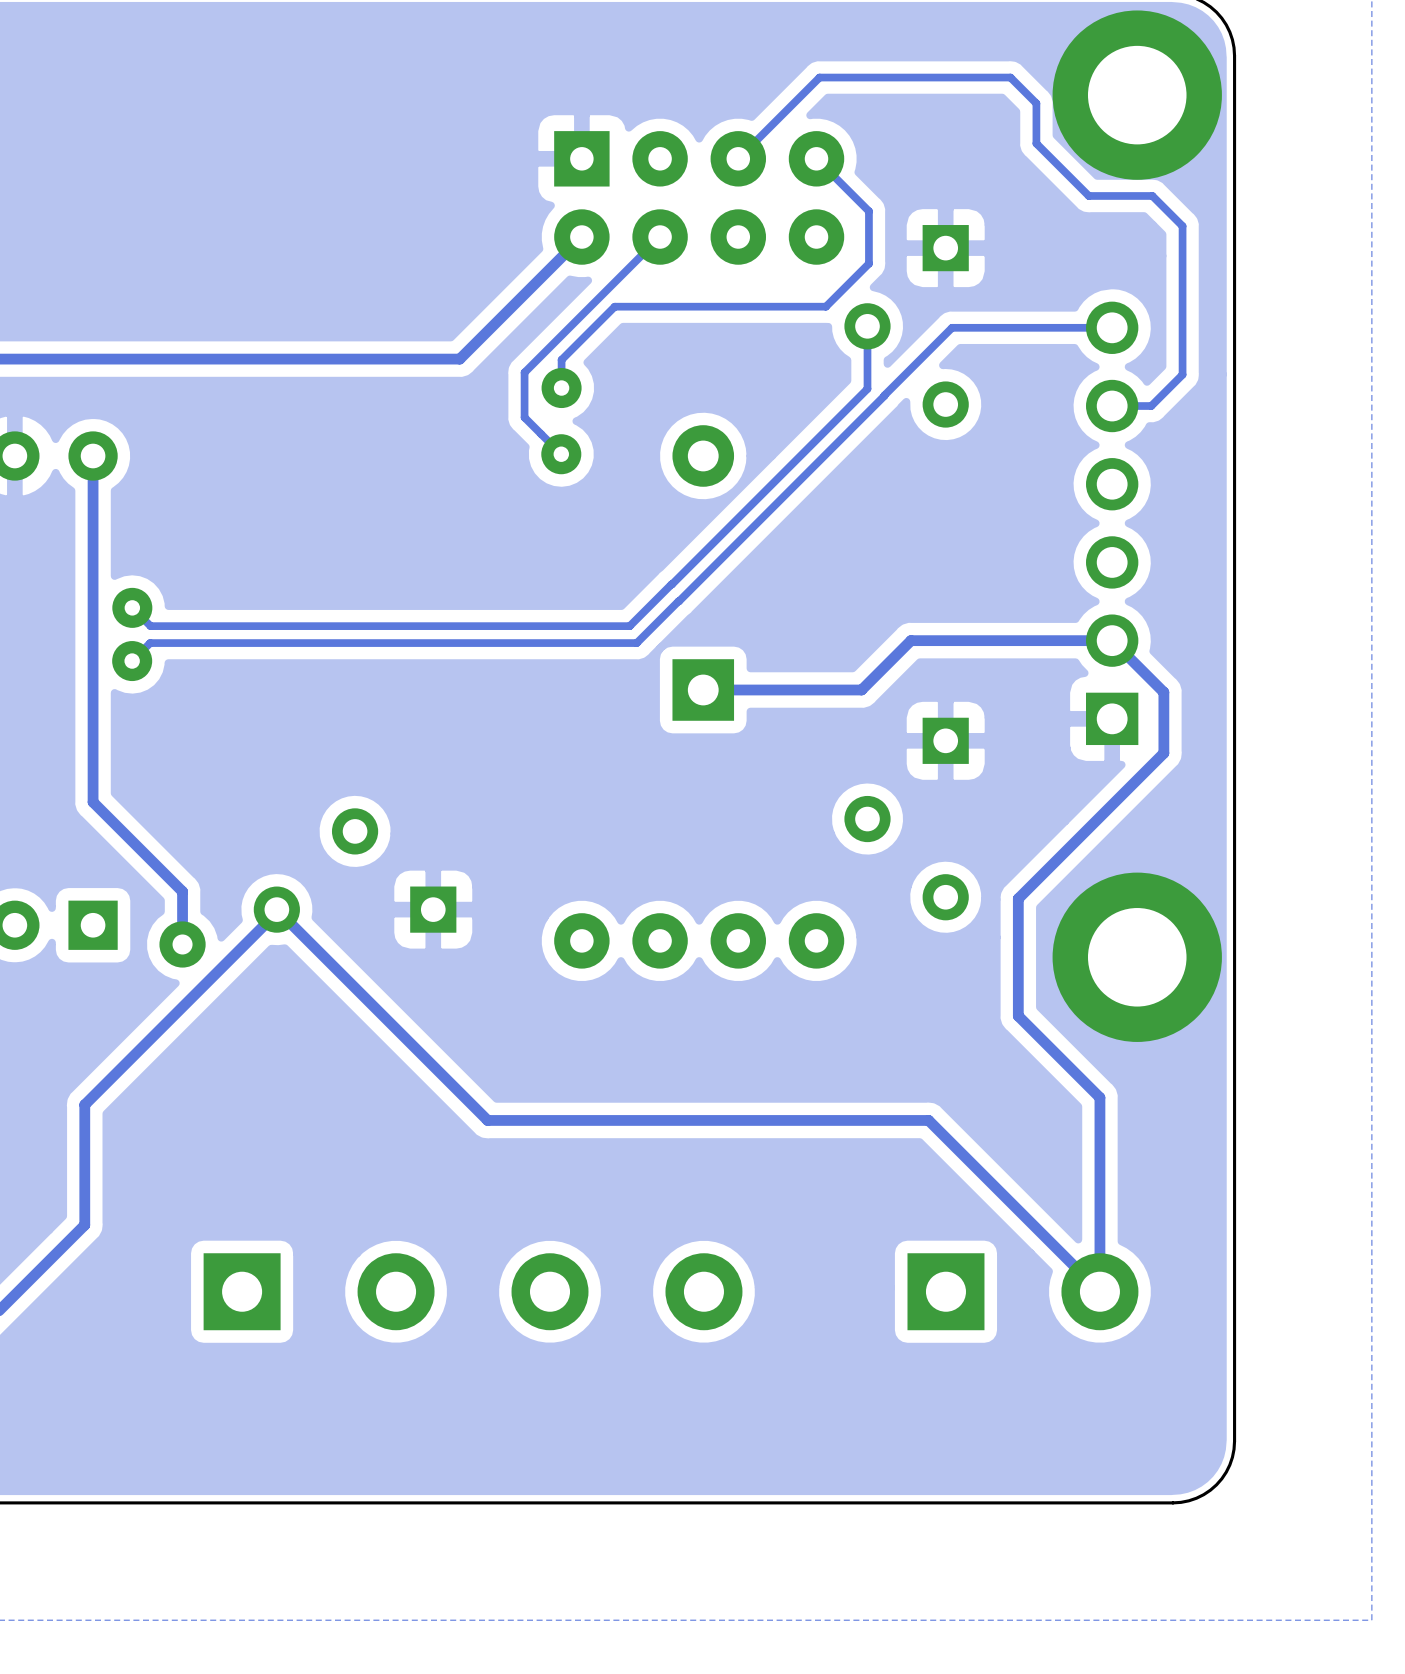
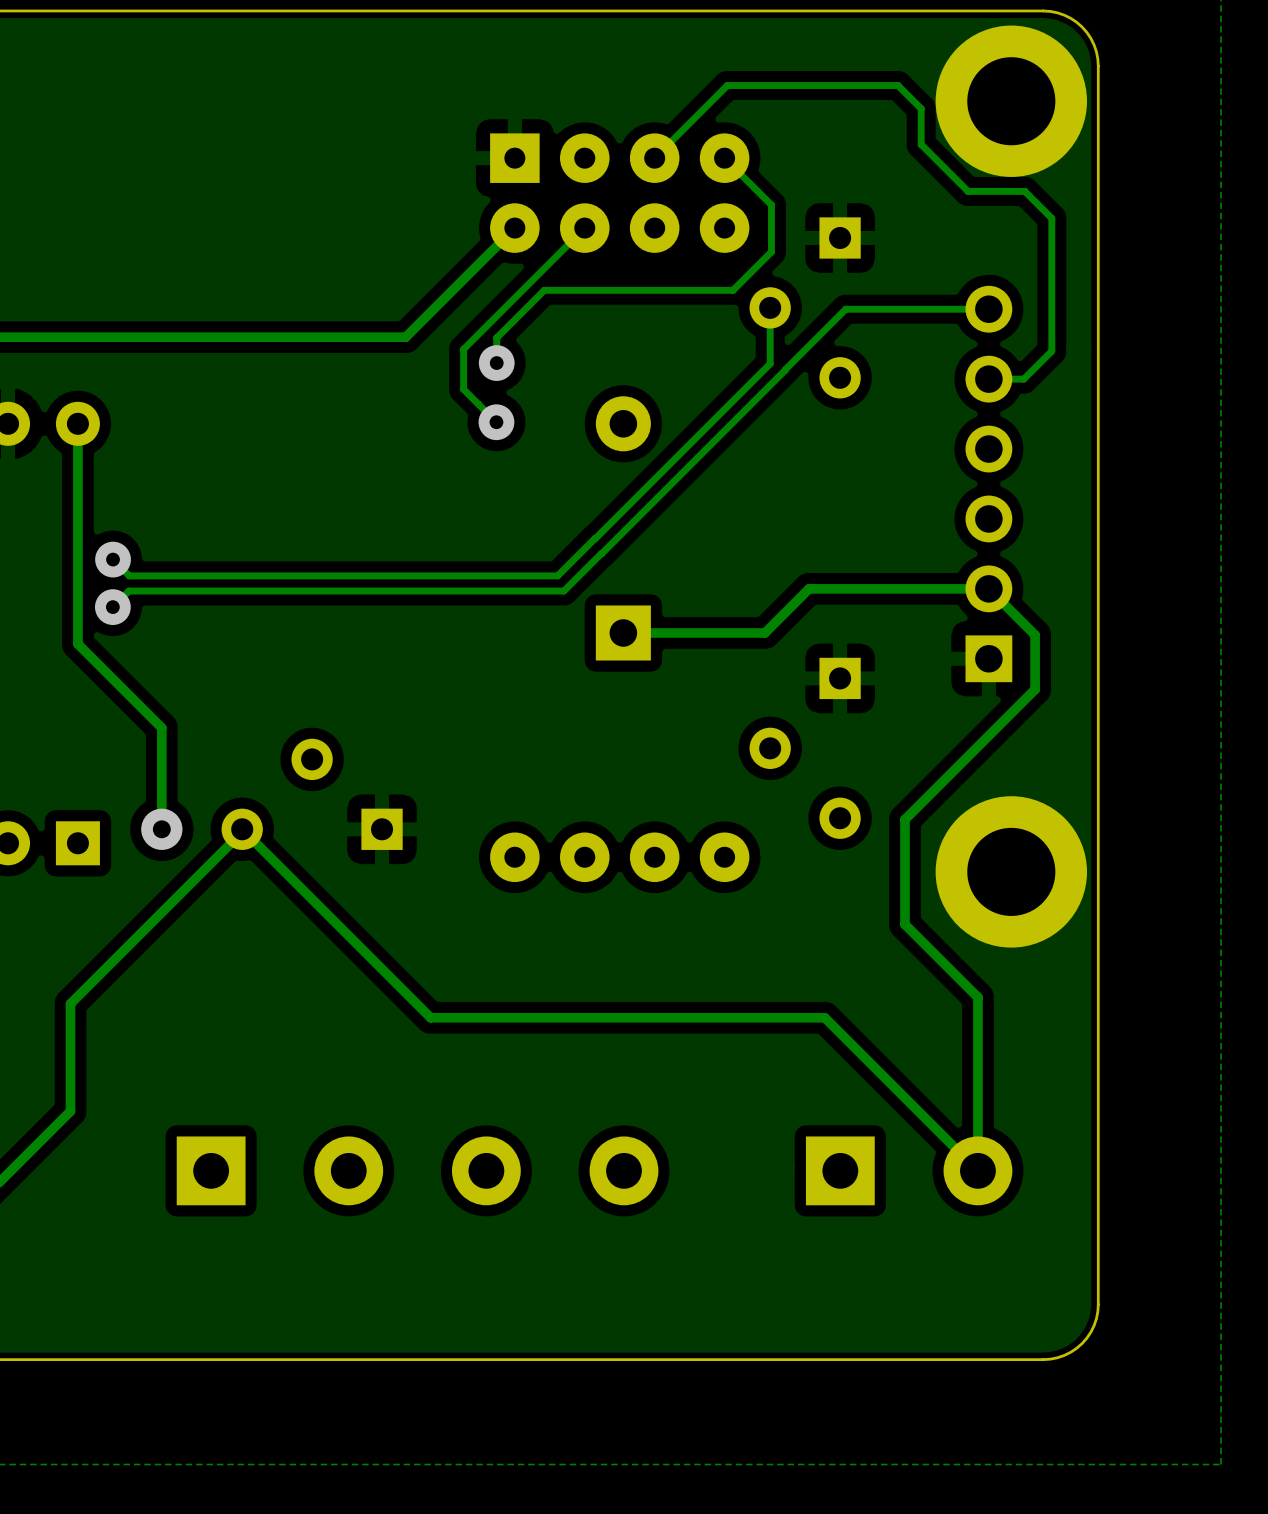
track: (93, 702) (93, 802) (182, 891) (182, 944) -> (77, 644) (161, 727) (161, 829)
via position: (182, 944) -> (161, 829)

